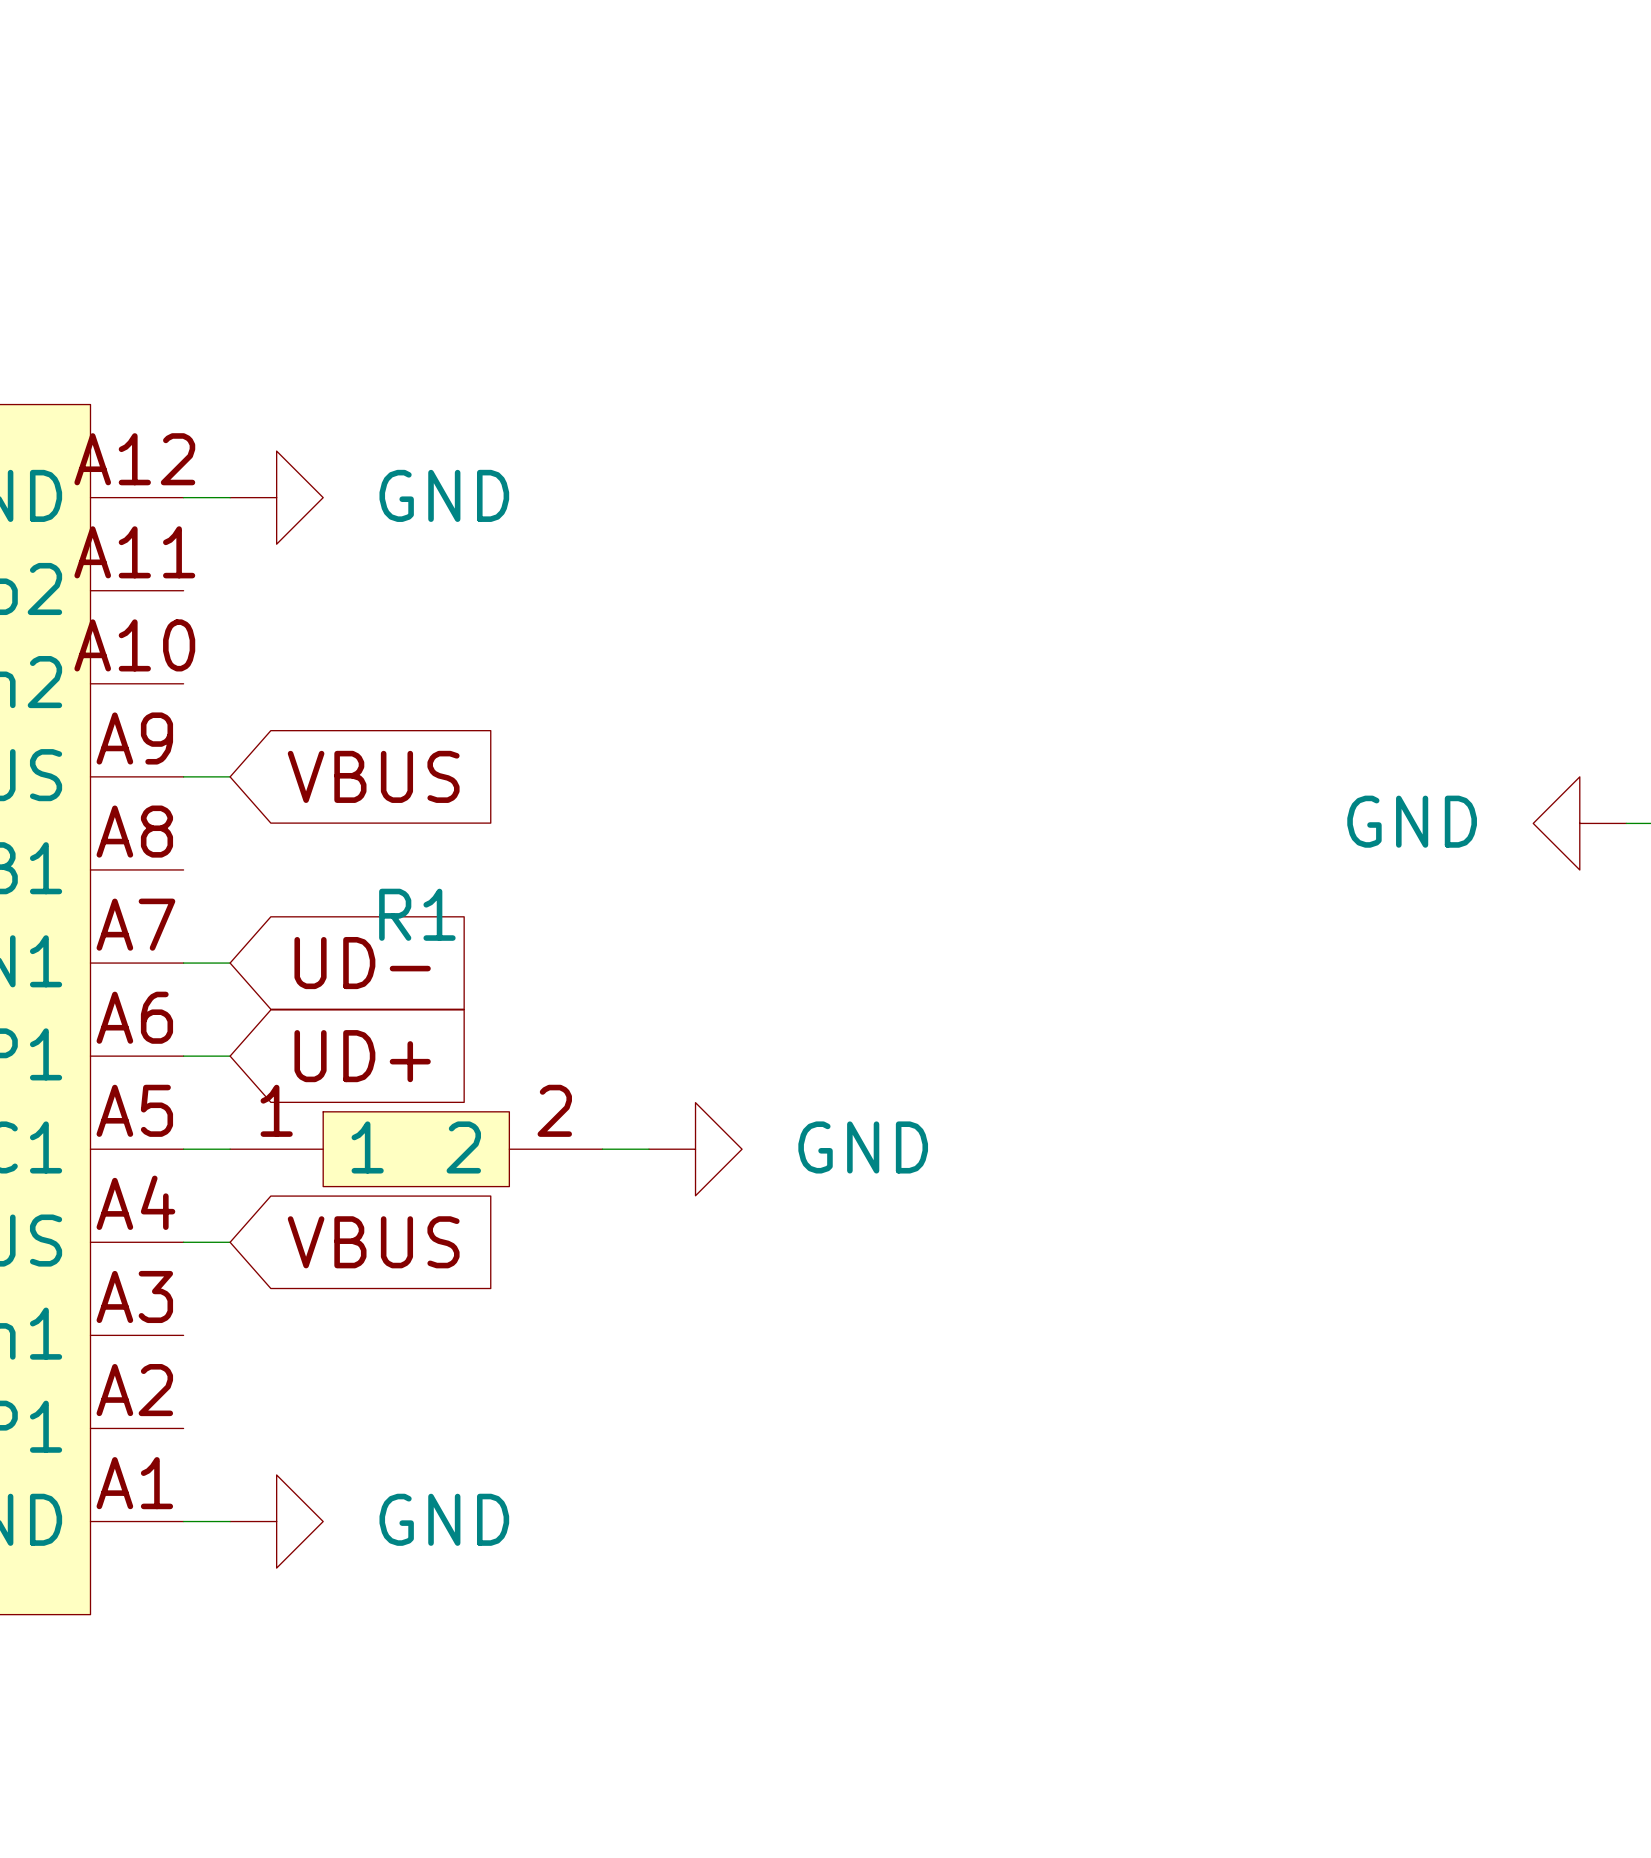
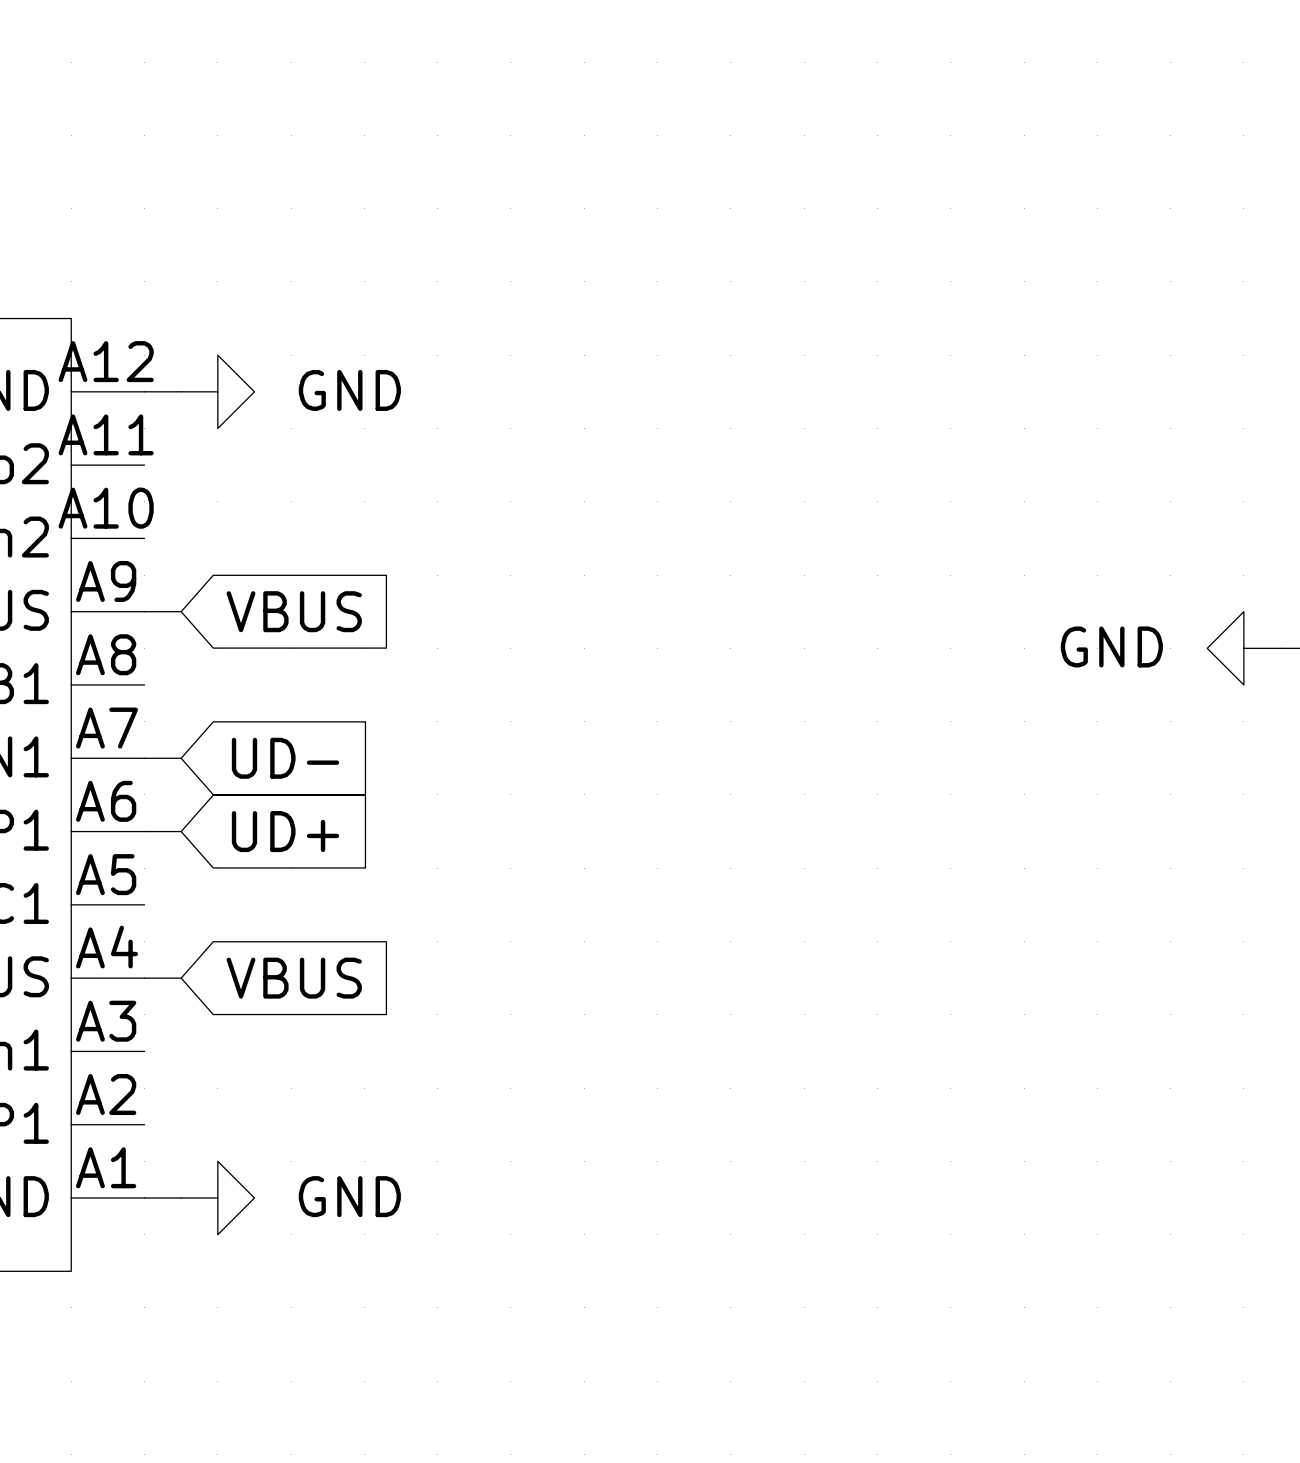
wire: (183, 1149) (230, 1149) -> none
R1: (416, 1149) -> none
wire: (602, 1149) (648, 1149) -> none
power symbol: GND (695, 1149) -> none

